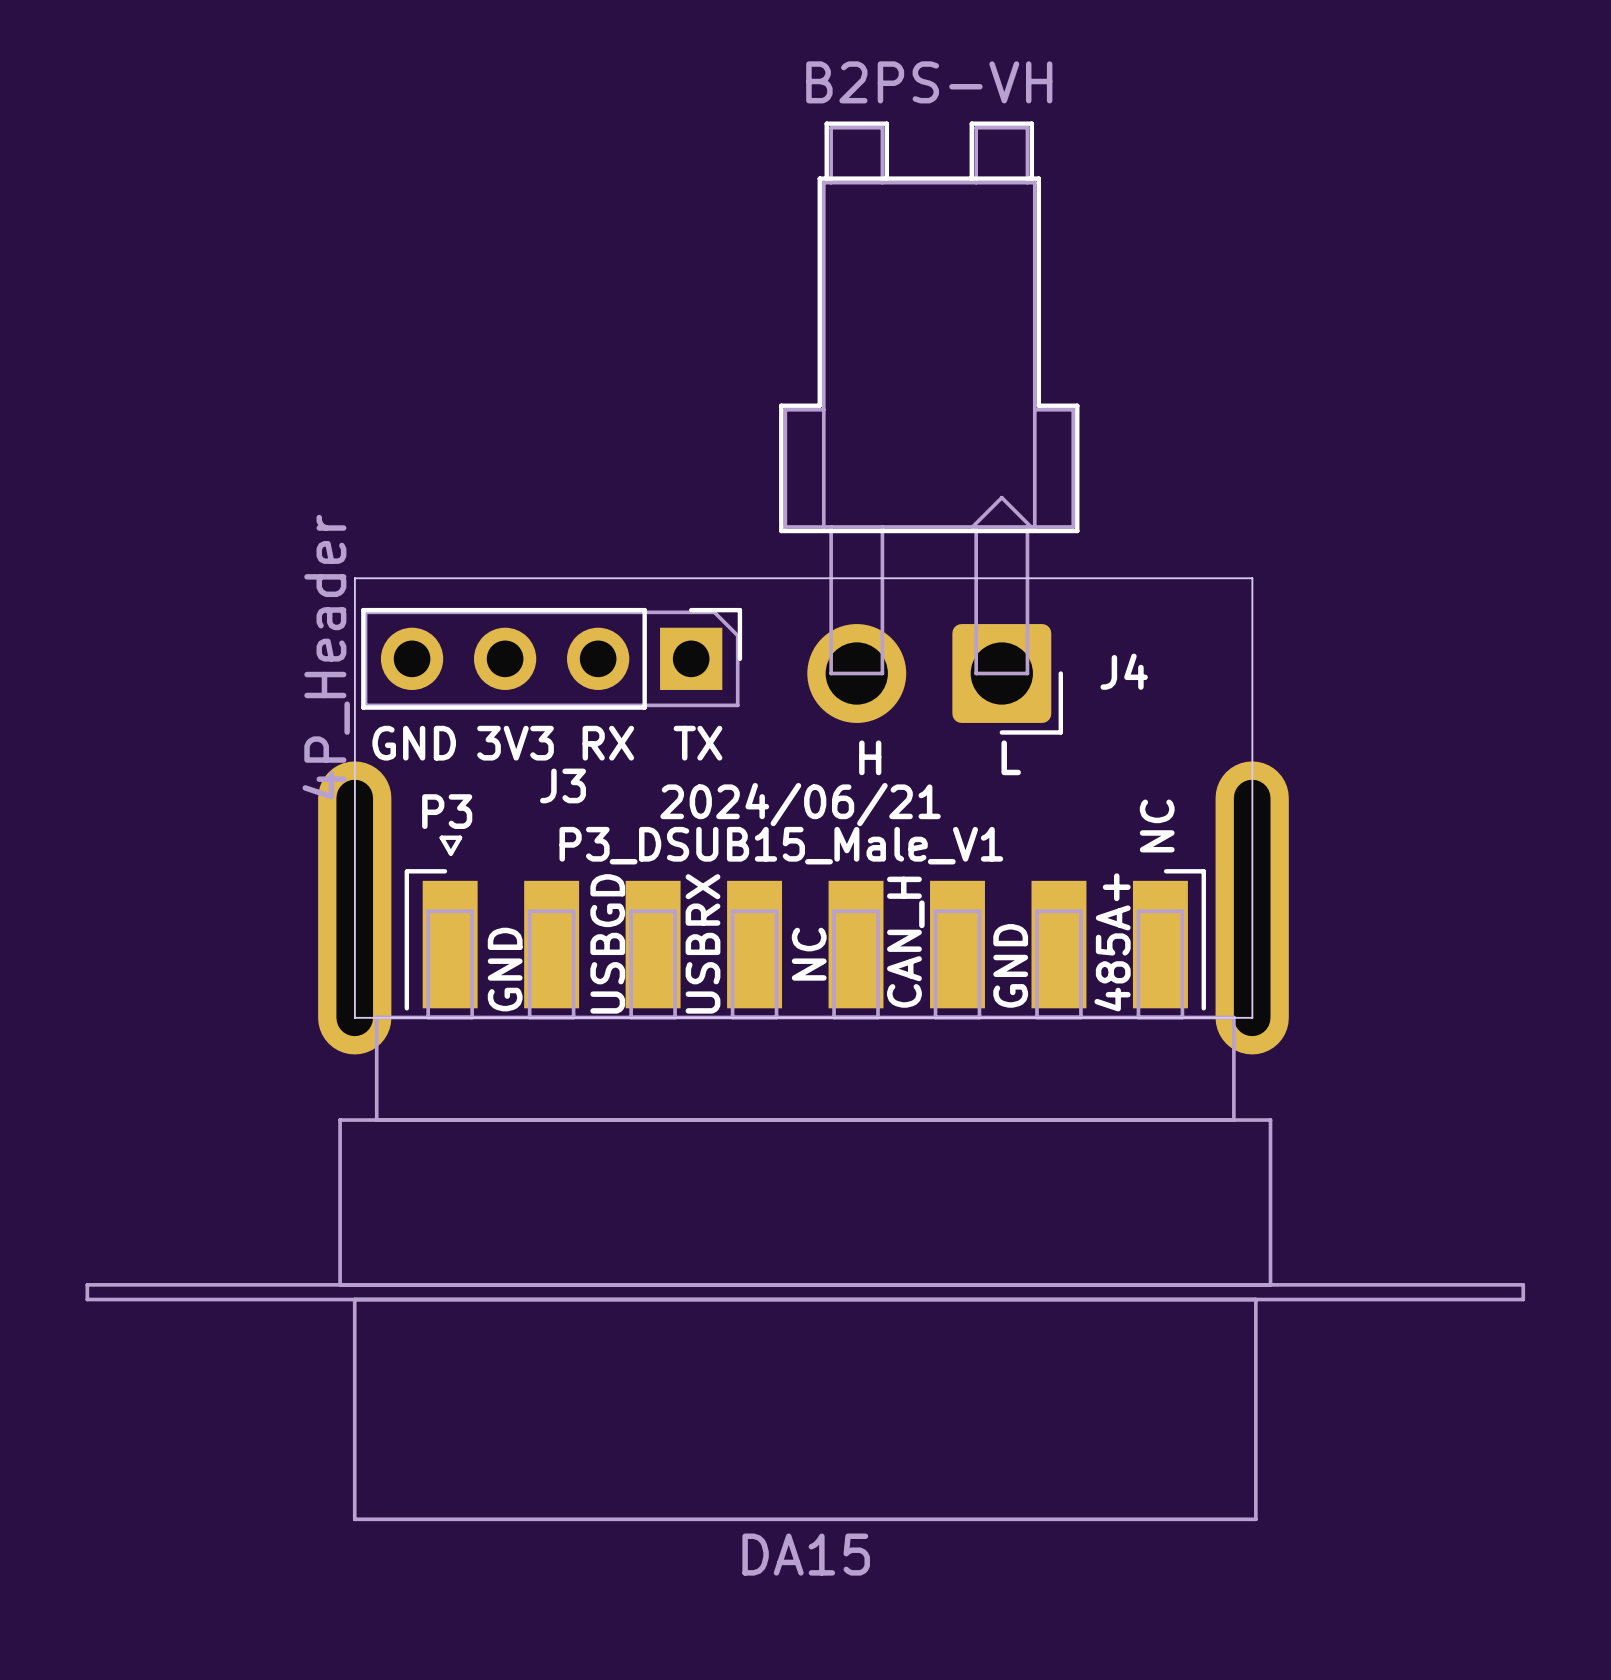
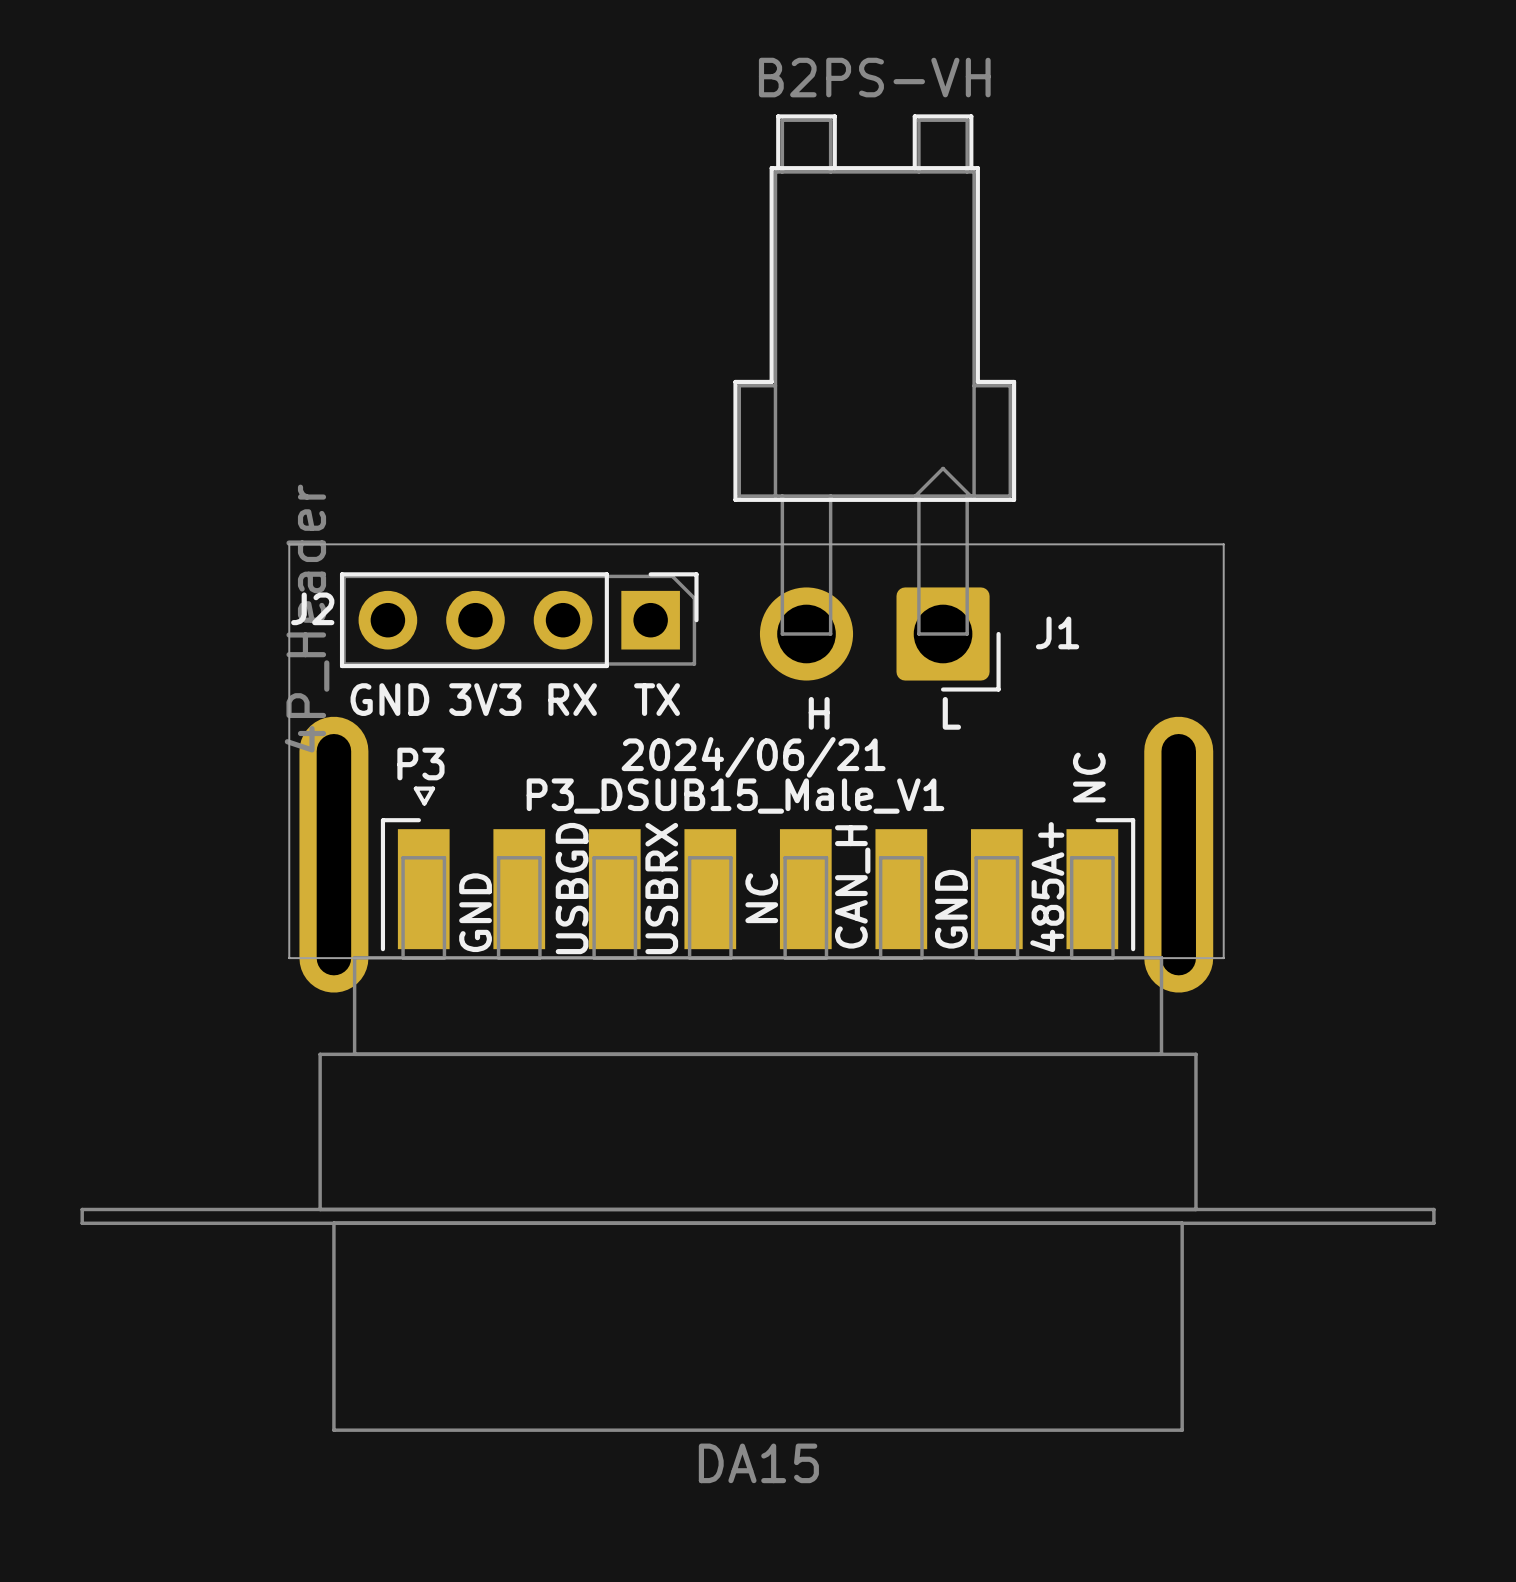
board edge: (354, 578) (354, 1017) -> (334, 544) (289, 544) (289, 958) (334, 958)
board edge: (1252, 578) (1252, 1017) -> (1178, 544) (1223, 544) (1223, 958) (1178, 958)
J4 name: J4 (1124, 671) -> J1 (1057, 632)
J3 name: J3 (563, 785) -> J2 (312, 608)

